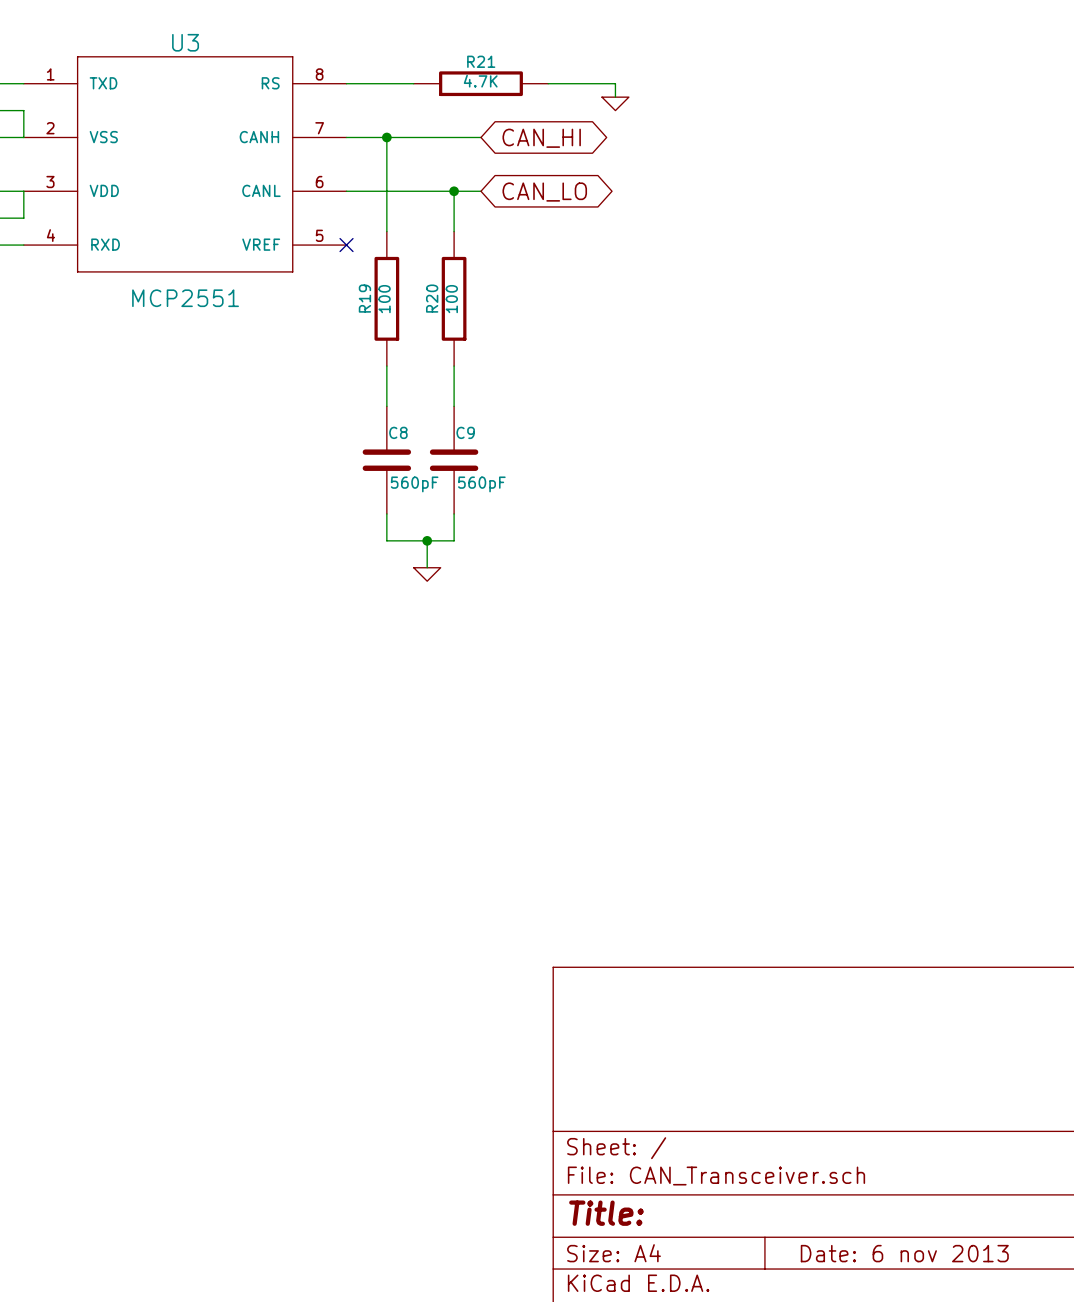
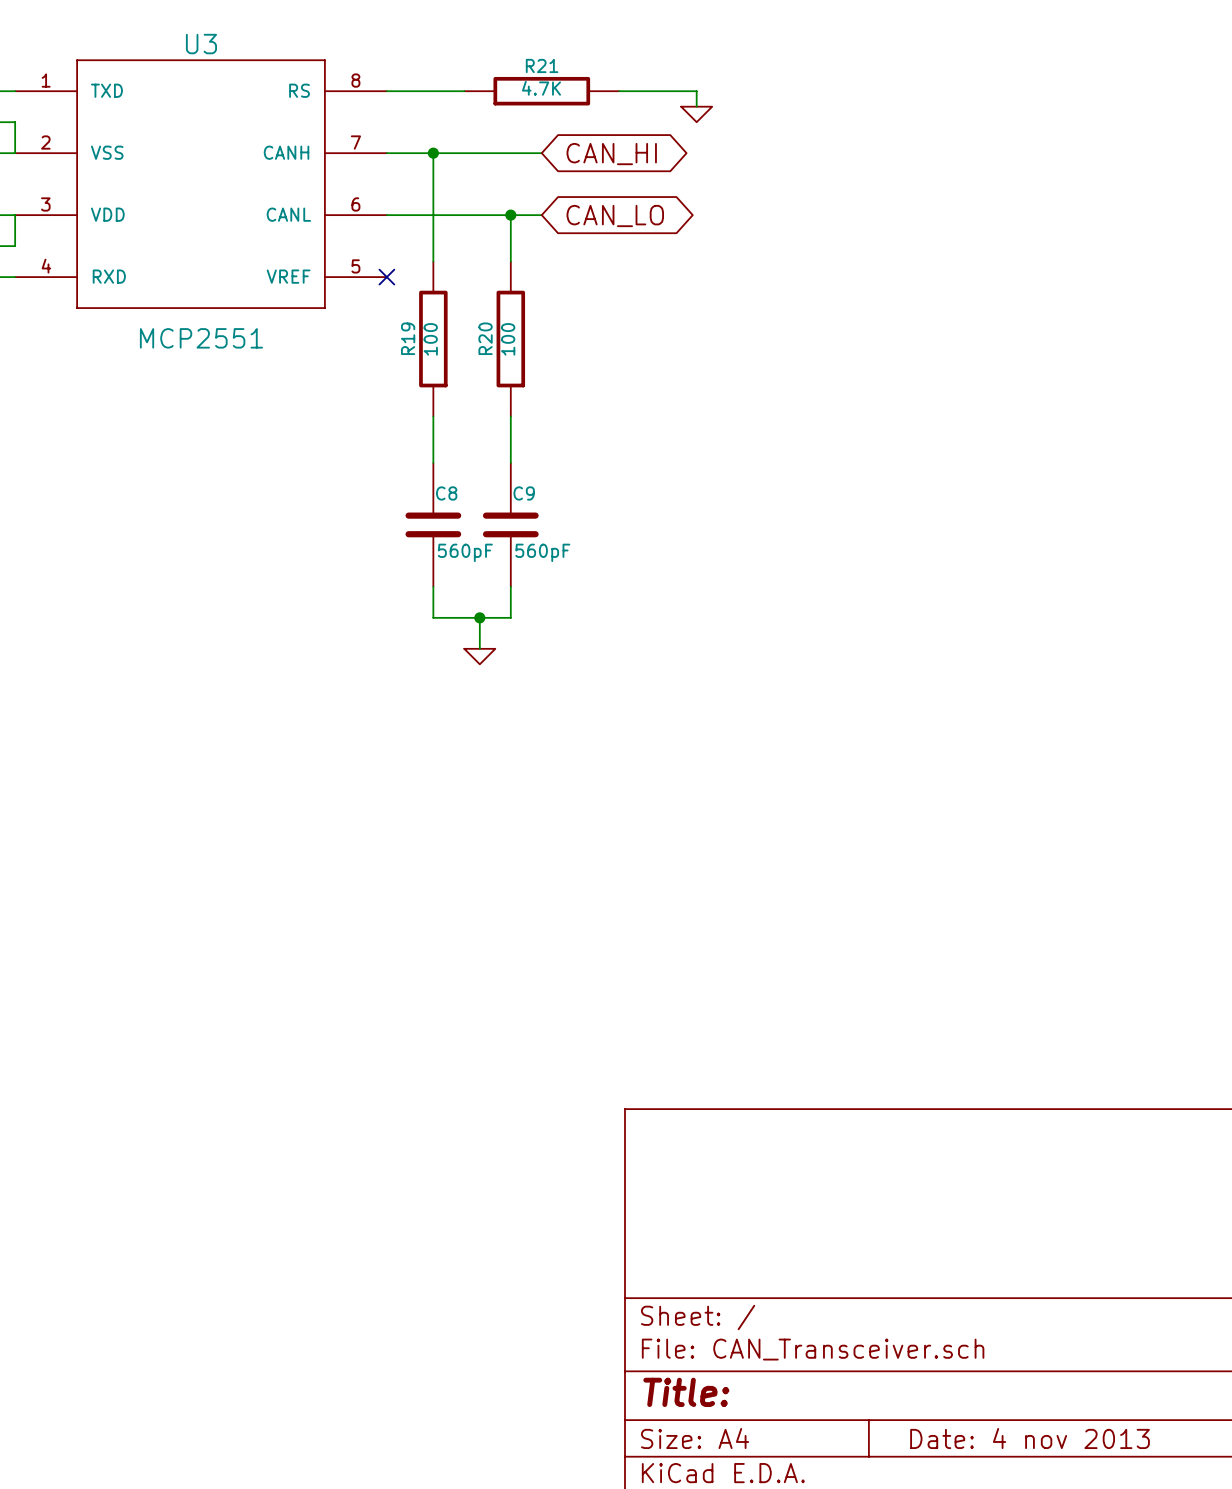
title block: Date: 6 nov 2013 (904, 1253) -> Date: 4 nov 2013 (1030, 1438)

